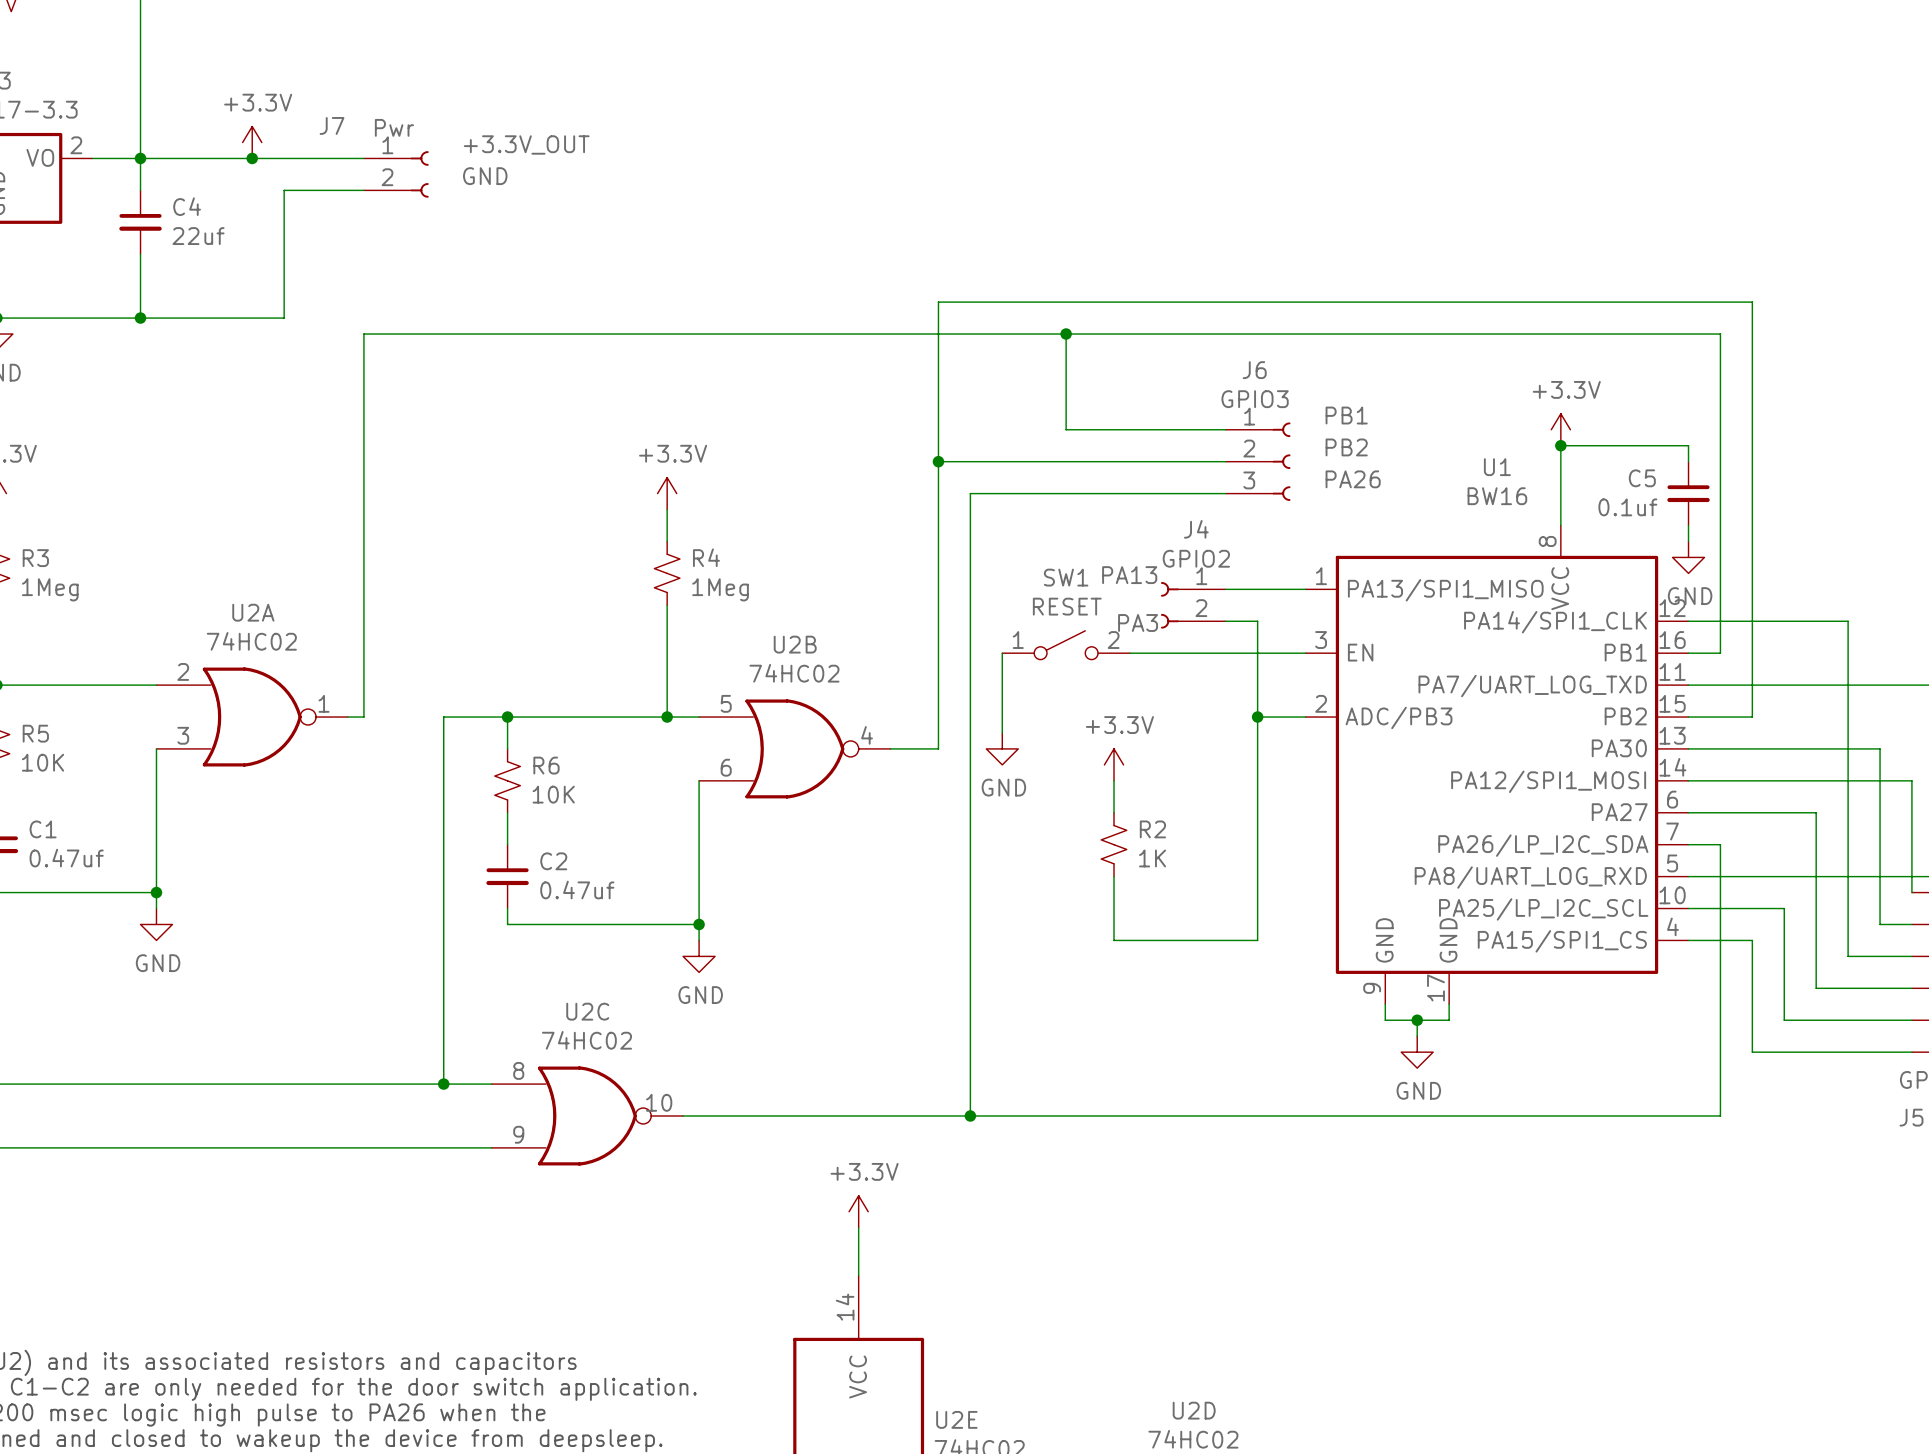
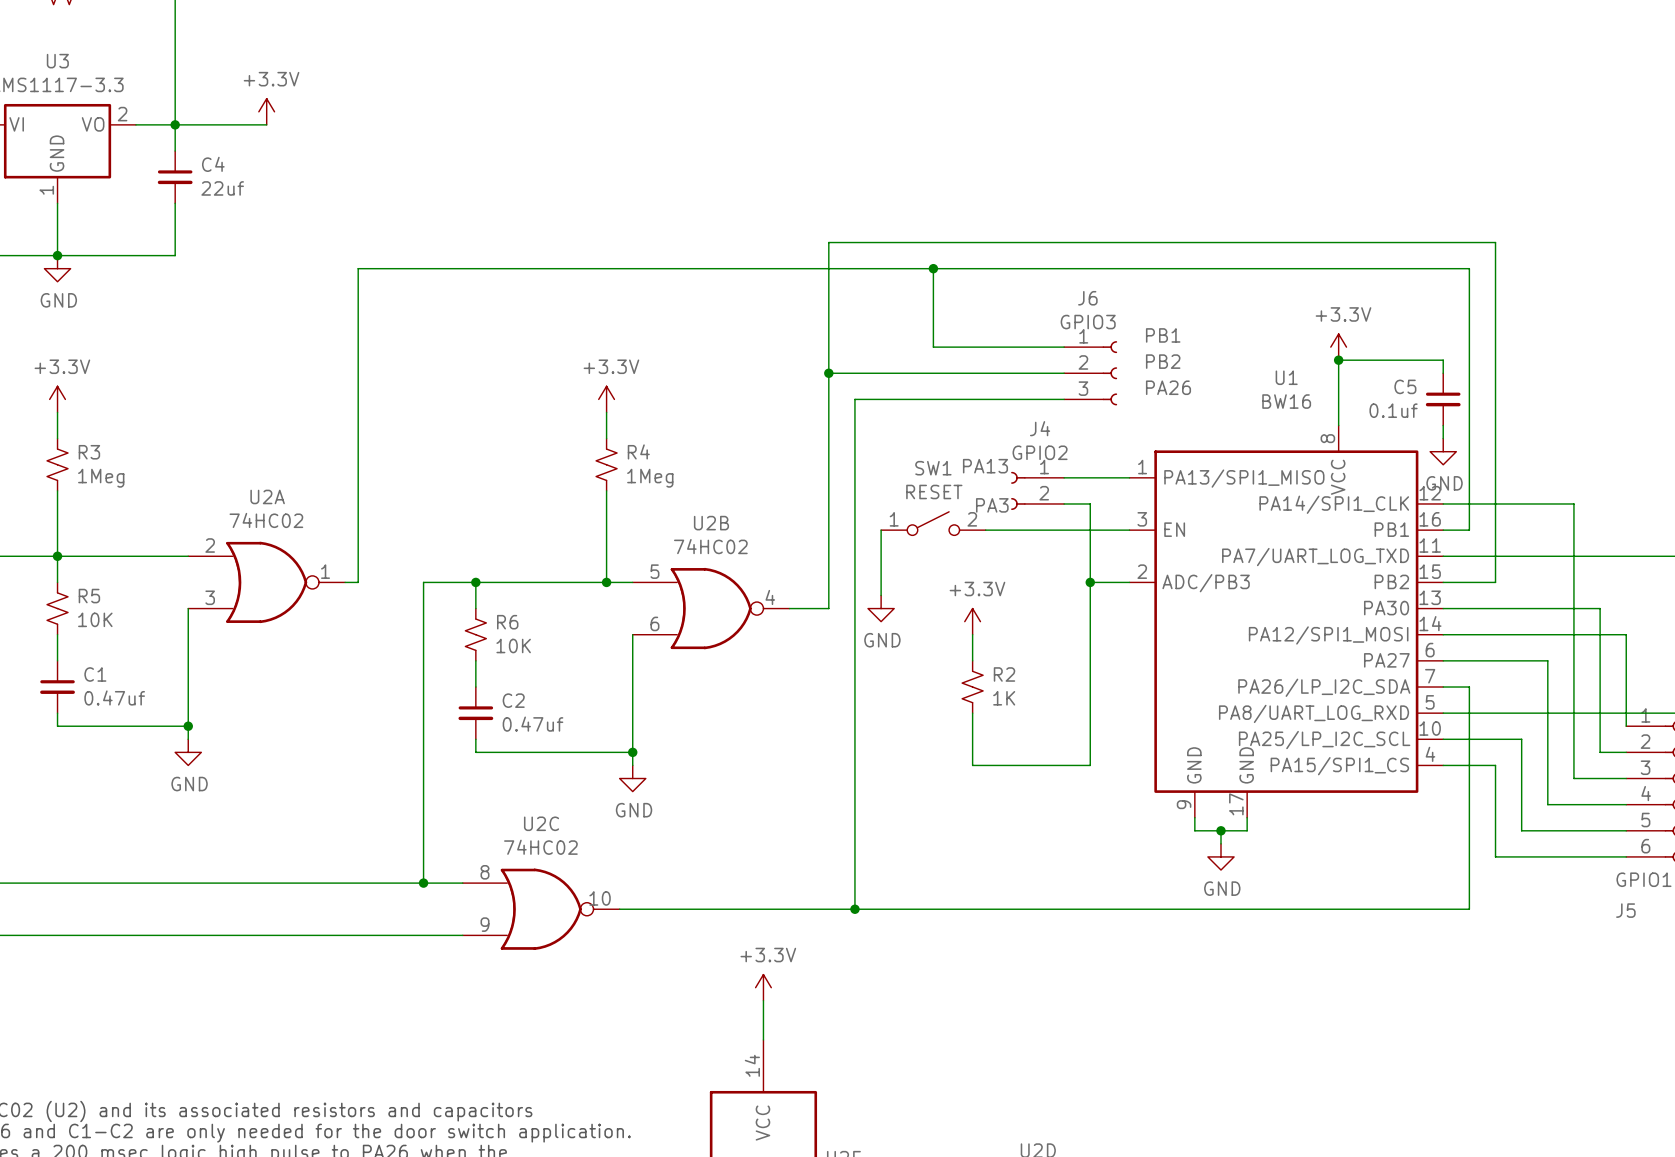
label: +3.3V_OUT (526, 144) -> none
wire: (252, 158) (363, 158) -> none
junction: (252, 158) -> none
J7: Pwr (396, 174) -> none
label: GND (485, 176) -> none
wire: (363, 190) (284, 190) (284, 318) (140, 318) -> none
junction: (140, 318) -> none

